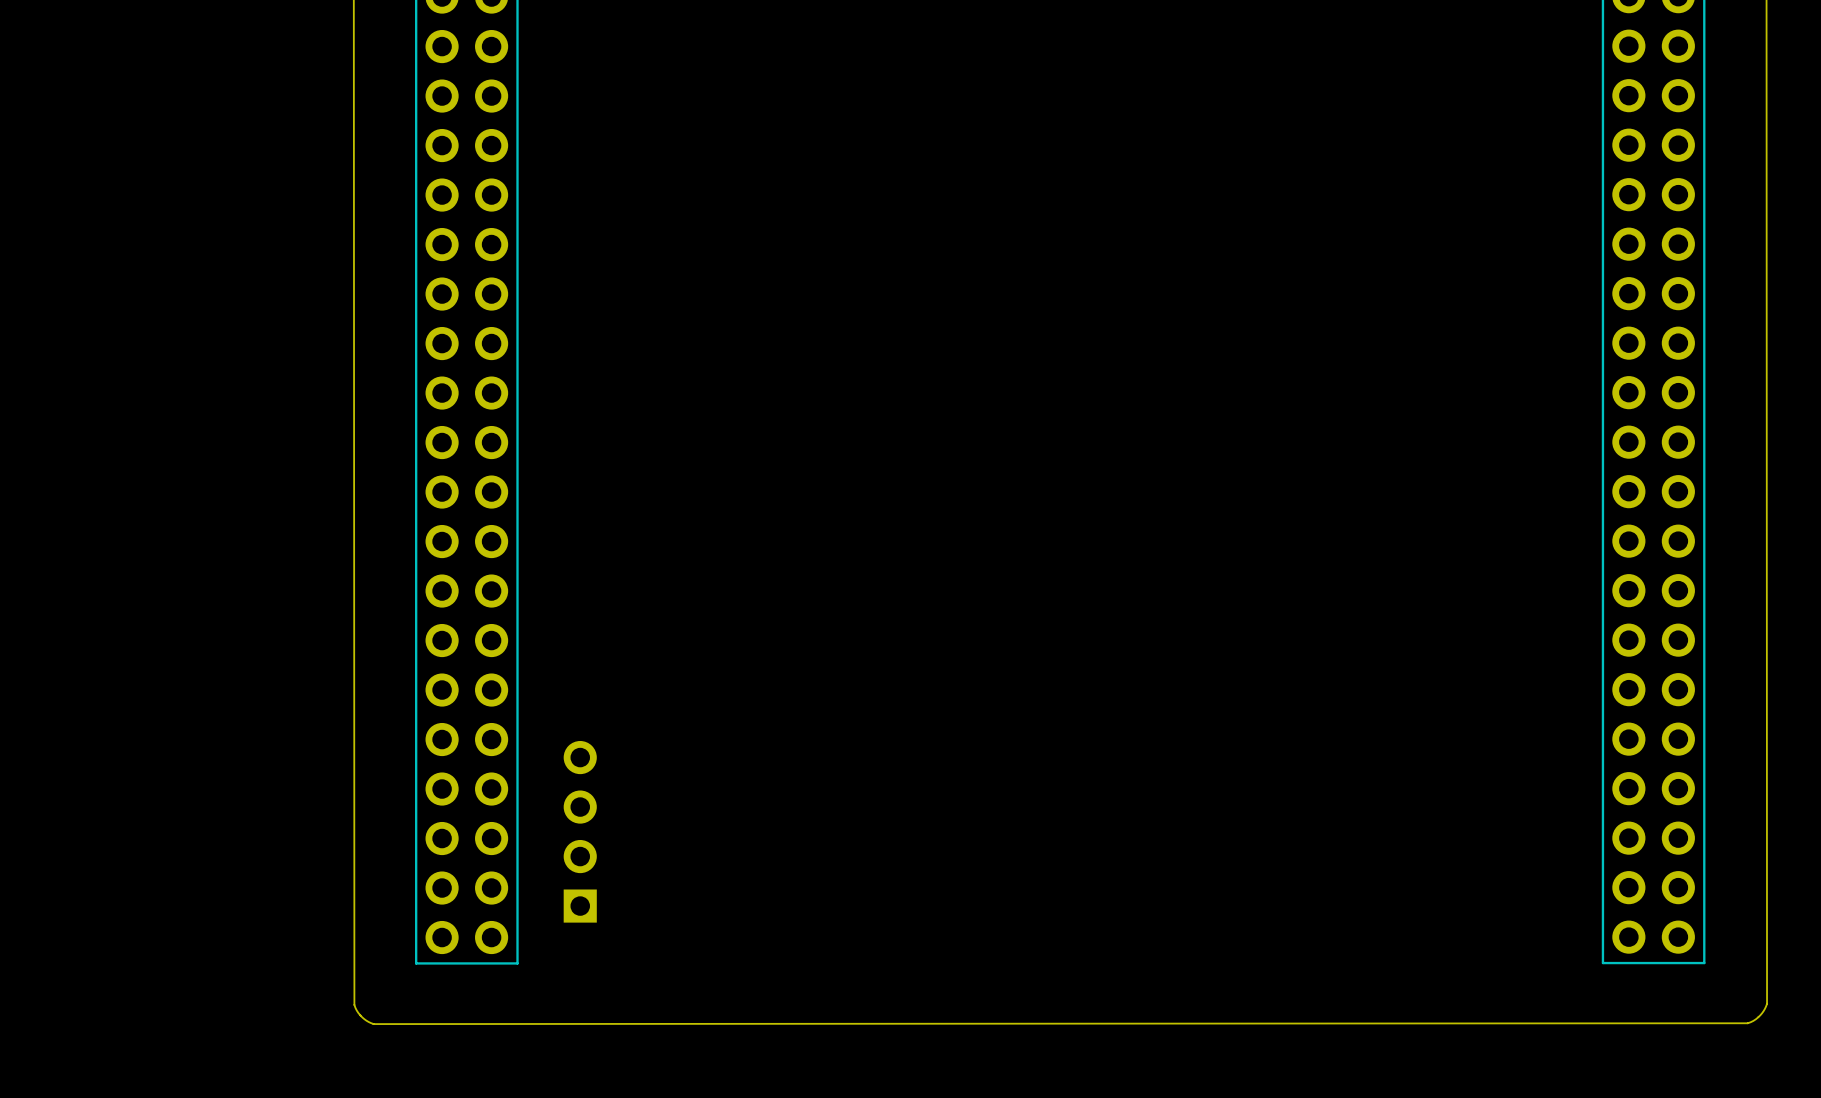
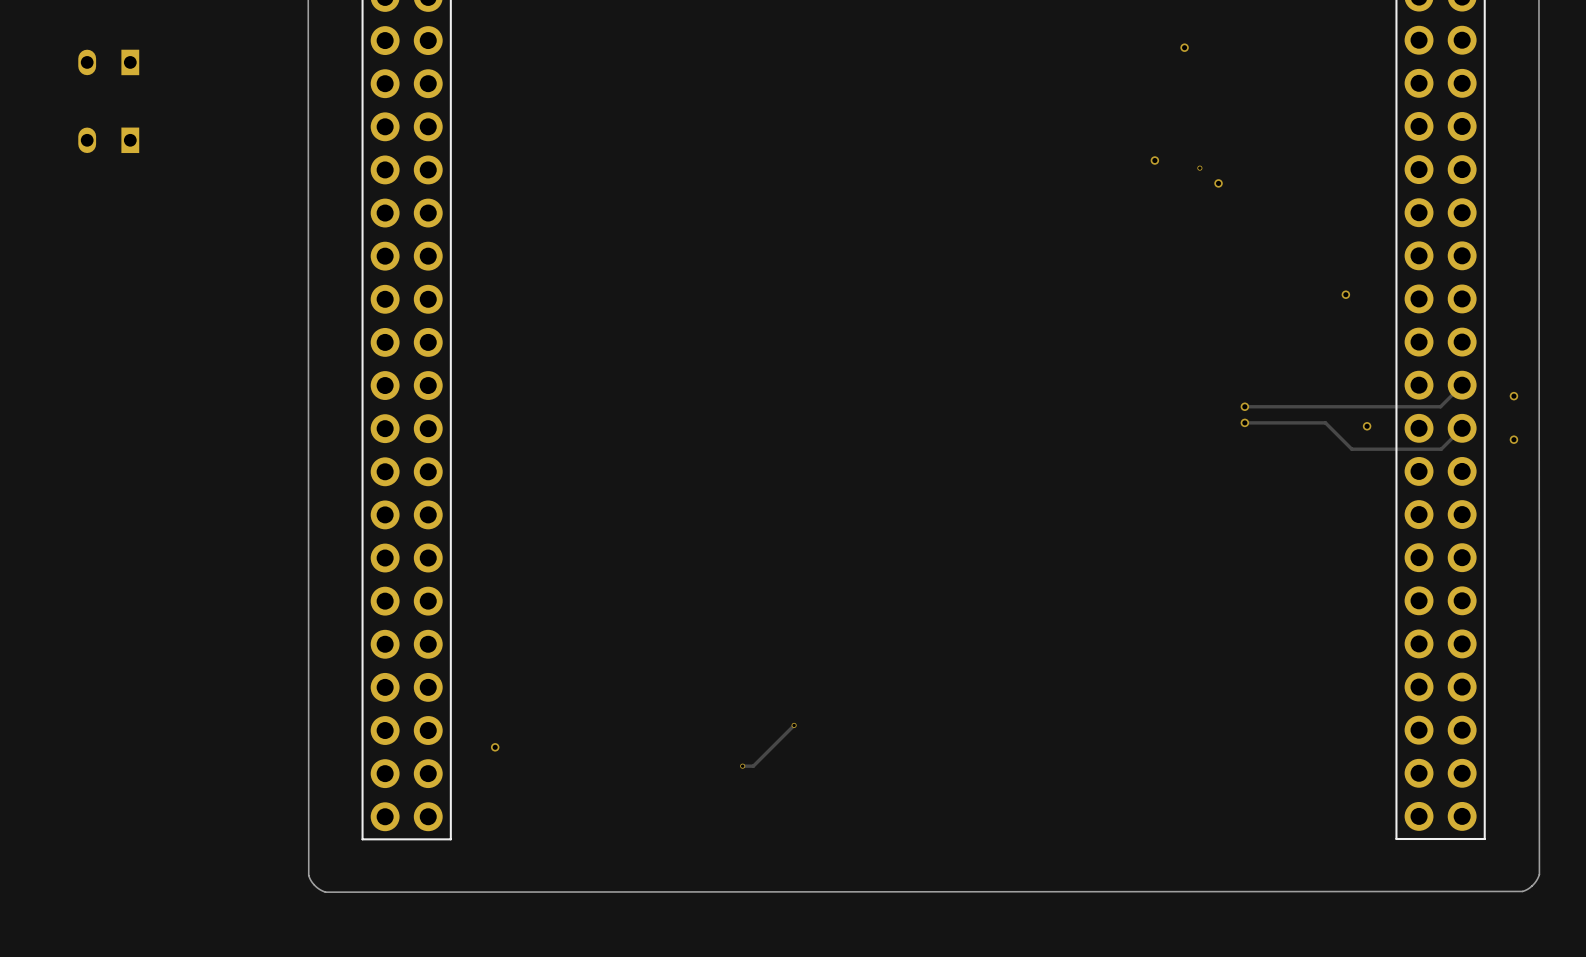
via: none -> (1184, 47)
part: none -> (108, 62)
part: none -> (108, 140)
via: none -> (1154, 160)
via: none -> (1199, 168)
via: none -> (1218, 183)
via: none -> (1345, 294)
track: none -> (1462, 385) (1440, 406) (1244, 406)
via: none -> (1513, 396)
via: none -> (1244, 406)
track: none -> (1244, 422) (1325, 422) (1351, 449) (1441, 449) (1462, 428)
via: none -> (1244, 422)
via: none -> (1367, 426)
via: none -> (1513, 439)
part: (580, 831) -> none
track: none -> (794, 725) (753, 766) (742, 766)
via: none -> (794, 725)
via: none -> (495, 747)
via: none -> (742, 766)

